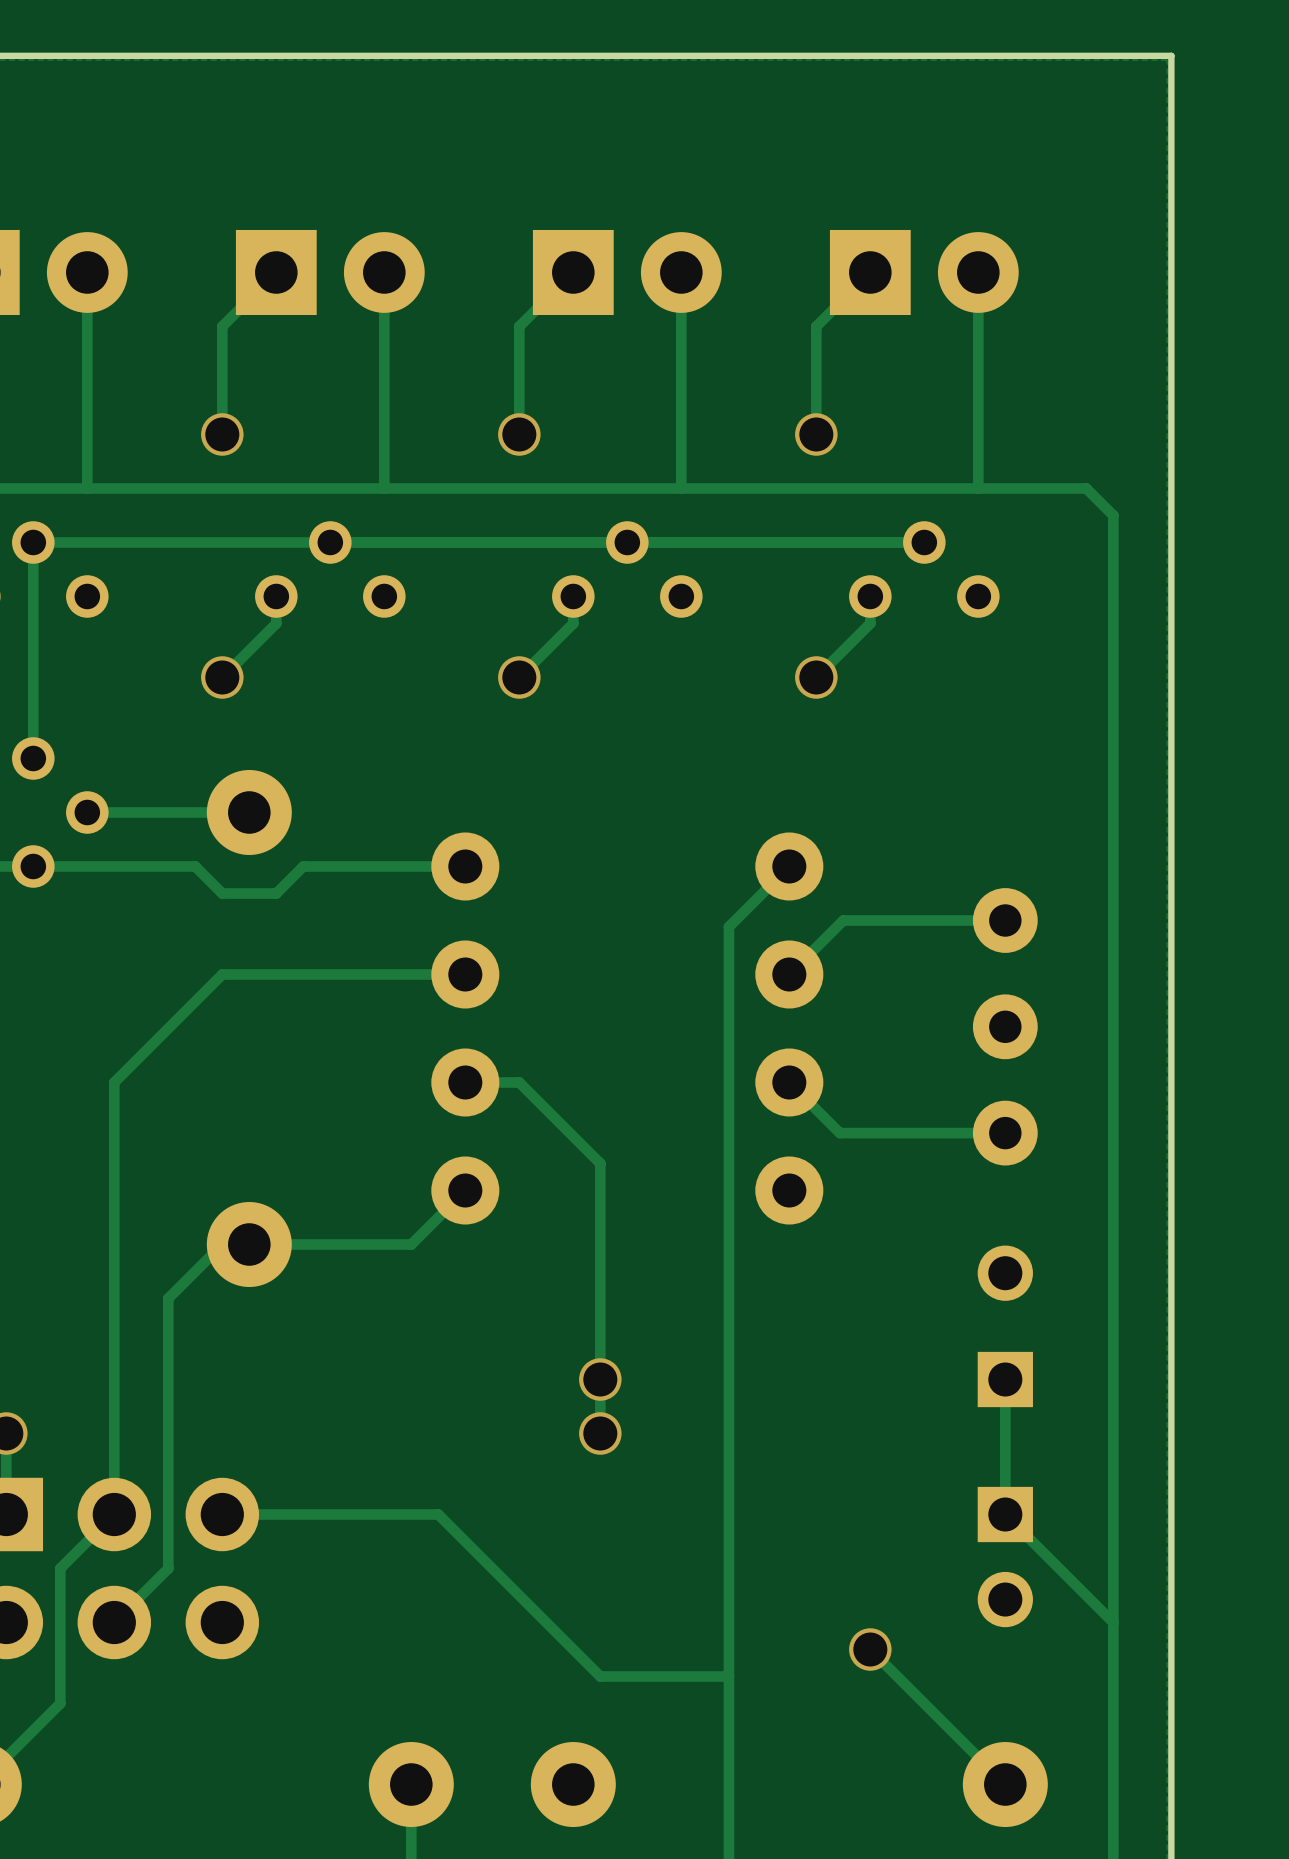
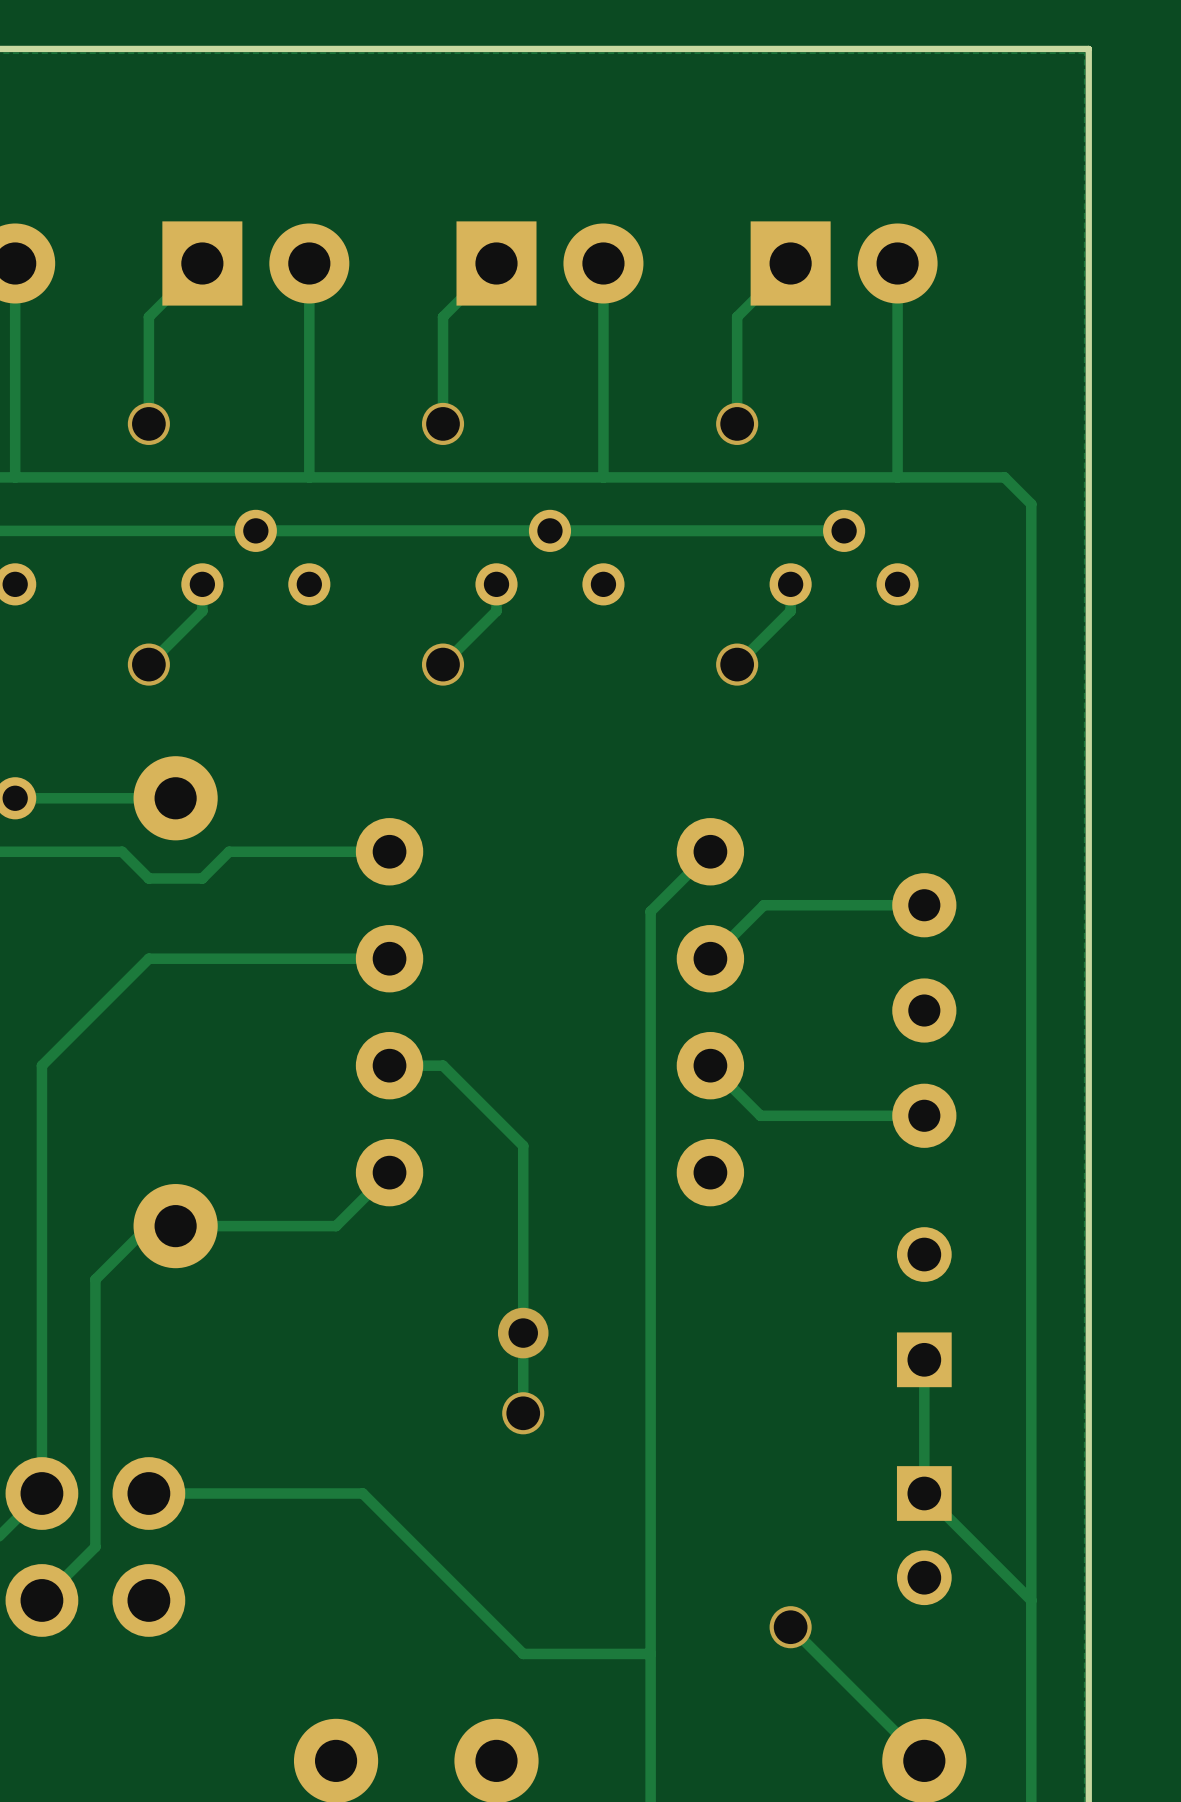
via position: (600, 1379) -> (523, 1333)

